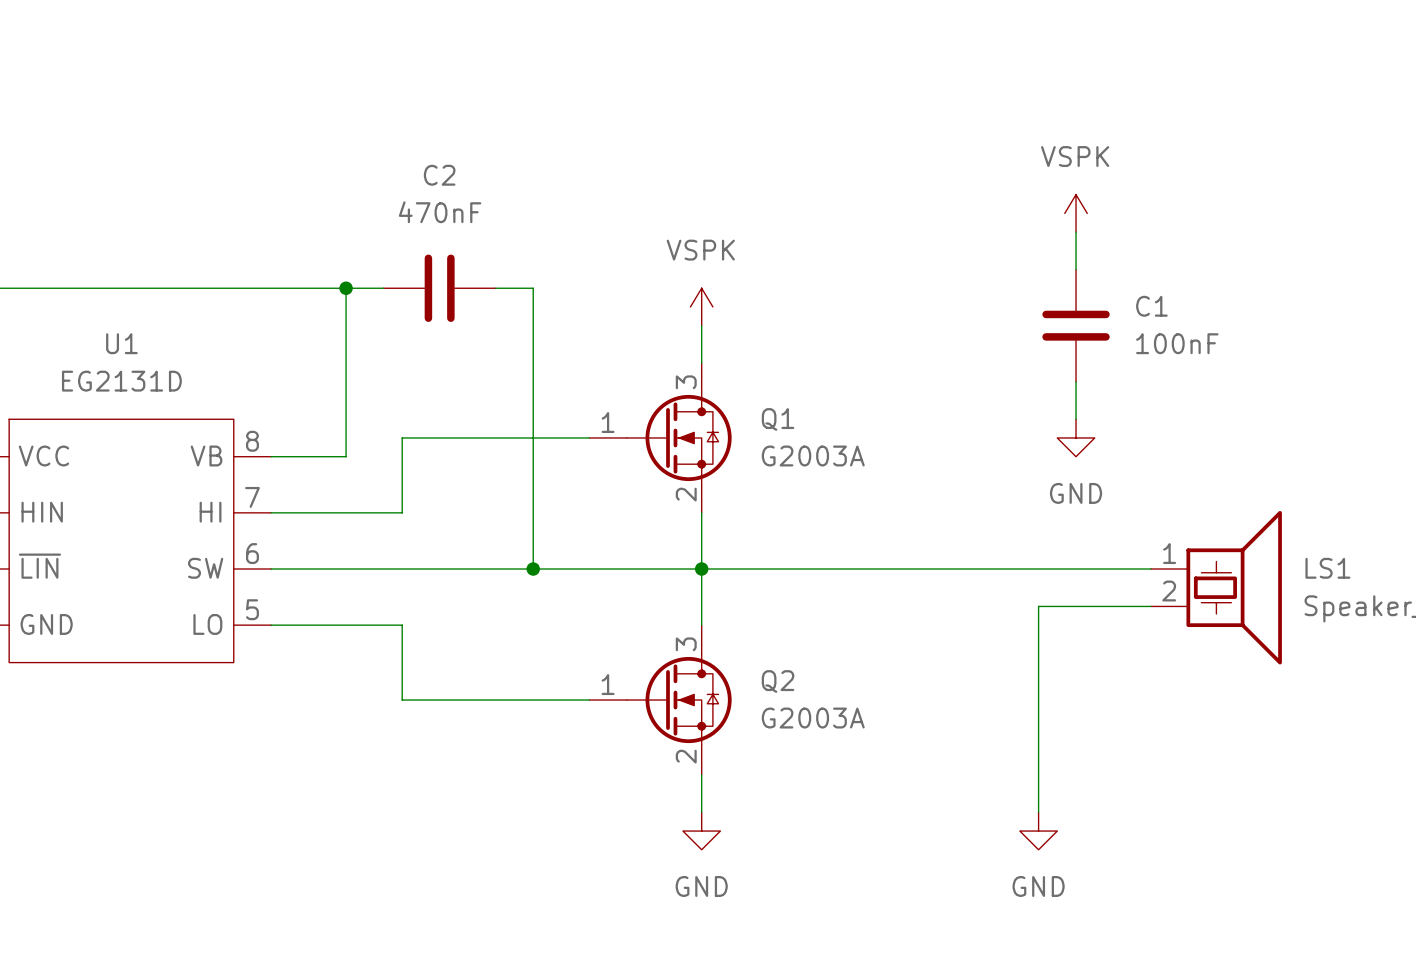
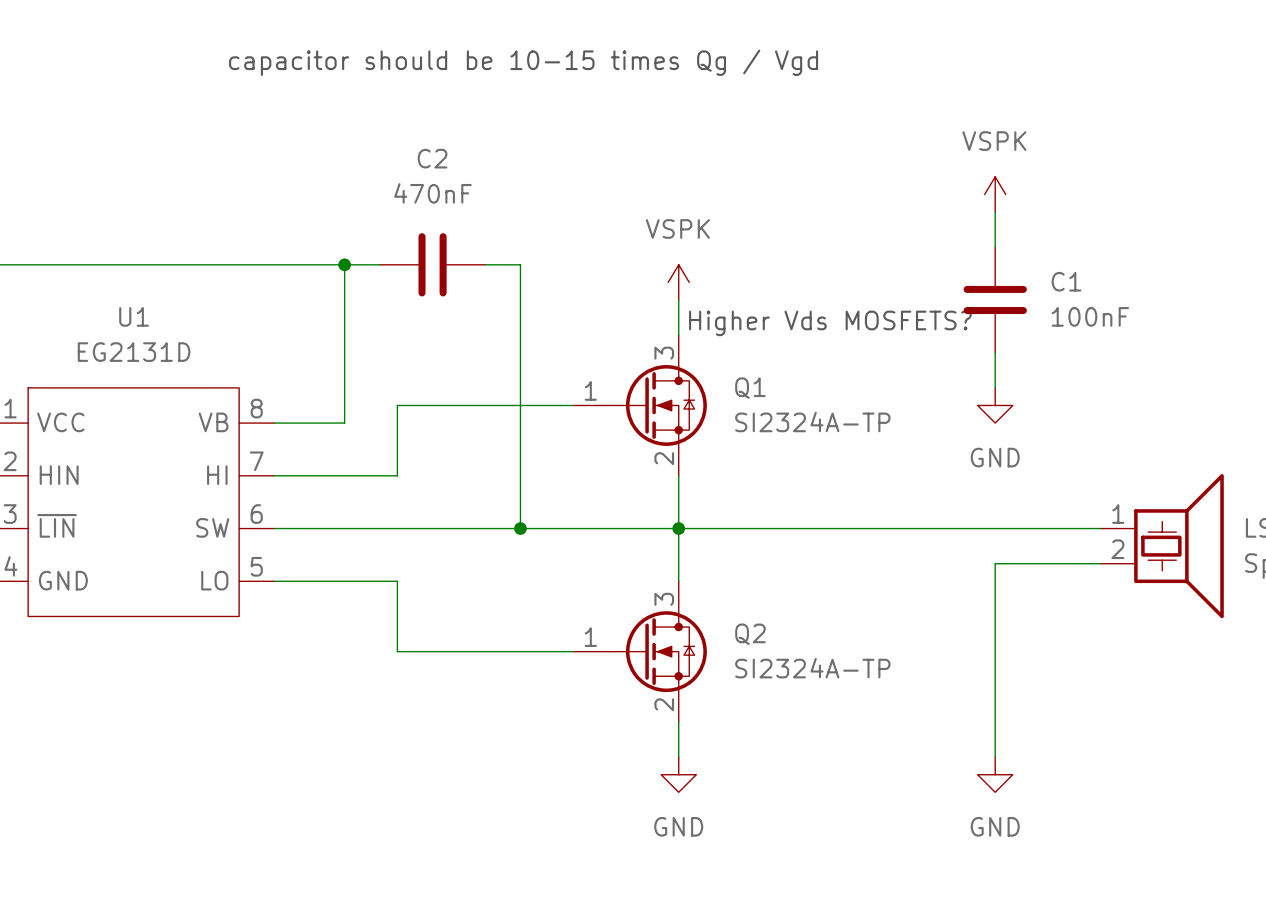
text: none -> capacitor should be 10-15 times Qg / Vgd (523, 62)
power symbol position: VSPK (1076, 213) -> VSPK (995, 194)
wire: (1076, 232) (1076, 269) -> (995, 212) (995, 247)
C1 position: (1076, 325) -> (995, 299)
text: none -> Higher Vds MOSFETS? (830, 323)
wire: (1076, 381) (1076, 419) -> (995, 352) (995, 387)
power symbol position: GND (1076, 437) -> GND (995, 405)
Q1 value: G2003A (813, 456) -> SI2324A-TP (812, 421)
Q2 value: G2003A (813, 718) -> SI2324A-TP (812, 668)

